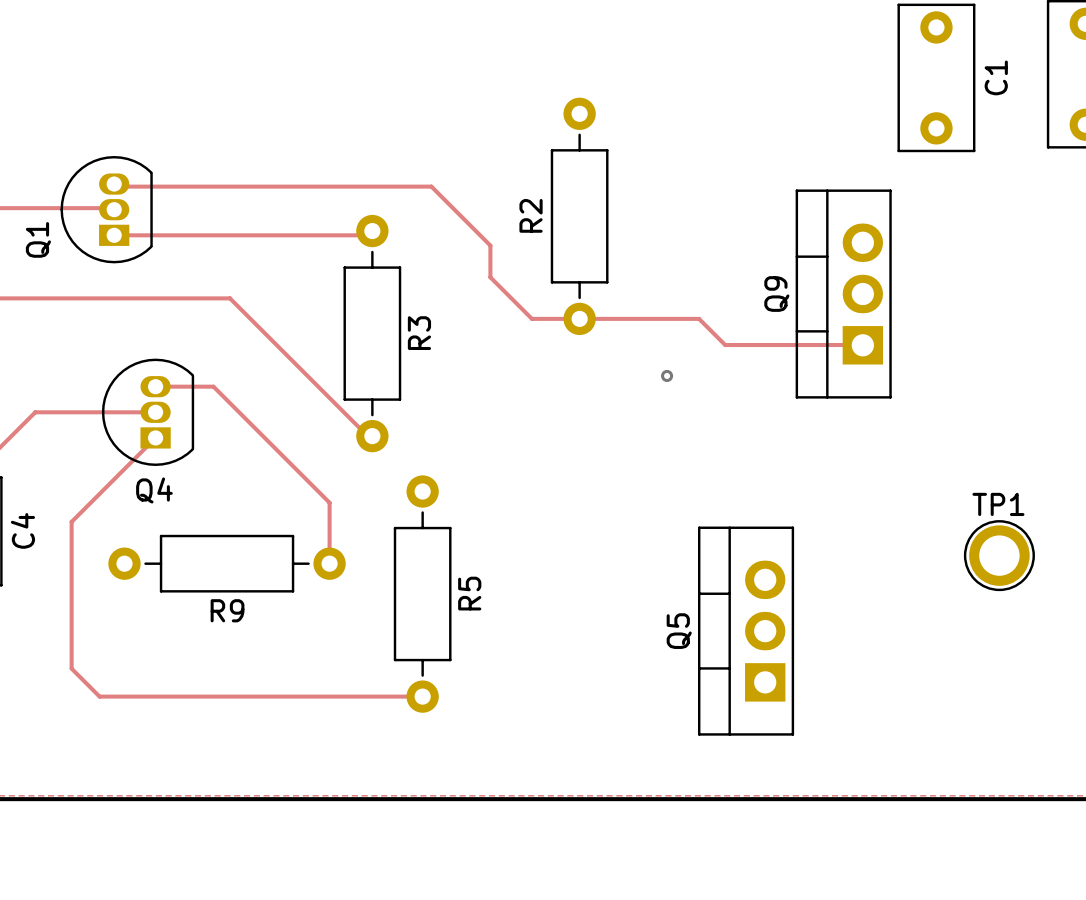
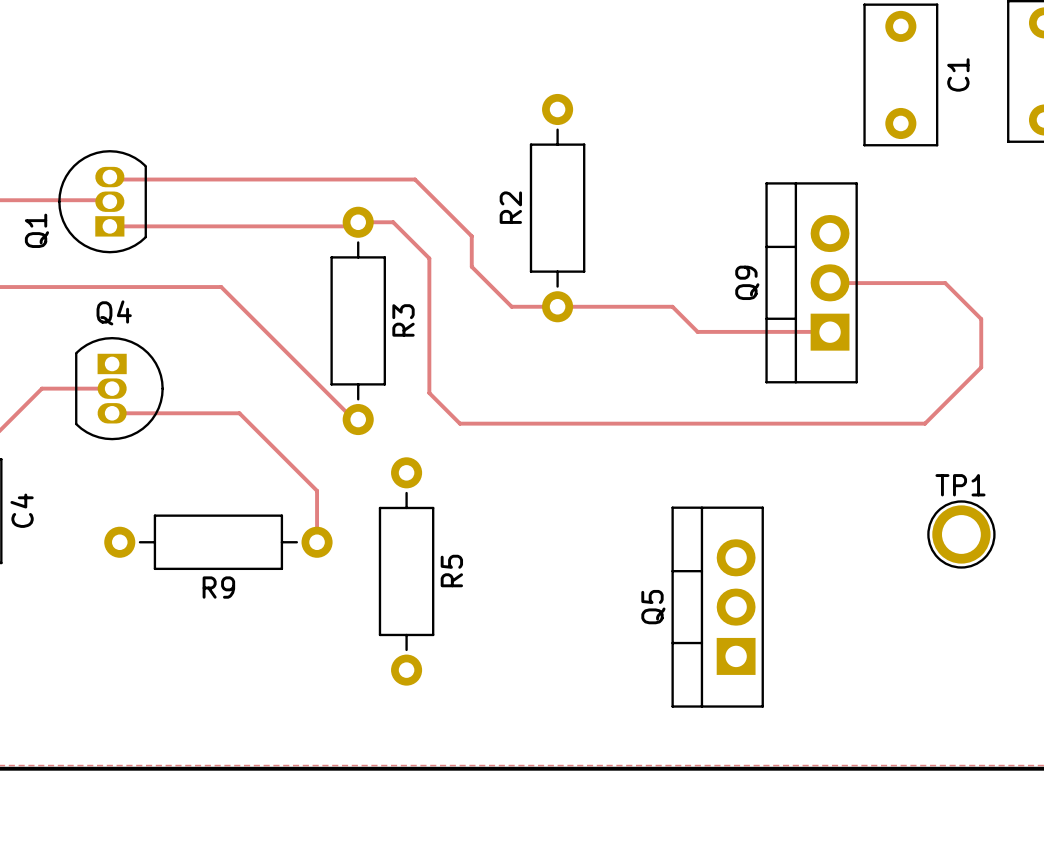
track: none -> (358, 222) (393, 222) (429, 258) (429, 393) (459, 423) (925, 423) (981, 367) (981, 319) (945, 283) (830, 283)
via: (667, 375) -> none
track: (155, 386) (213, 386) (329, 502) (329, 510) -> (112, 413) (239, 413) (317, 490)
track: (35, 412) (155, 412) -> (33, 396) (41, 388) (112, 388)
Q4 rotation: 0° (148, 412) -> 180° (119, 388)
track: (155, 437) (71, 521) (71, 668) (99, 696) (422, 696) -> none

